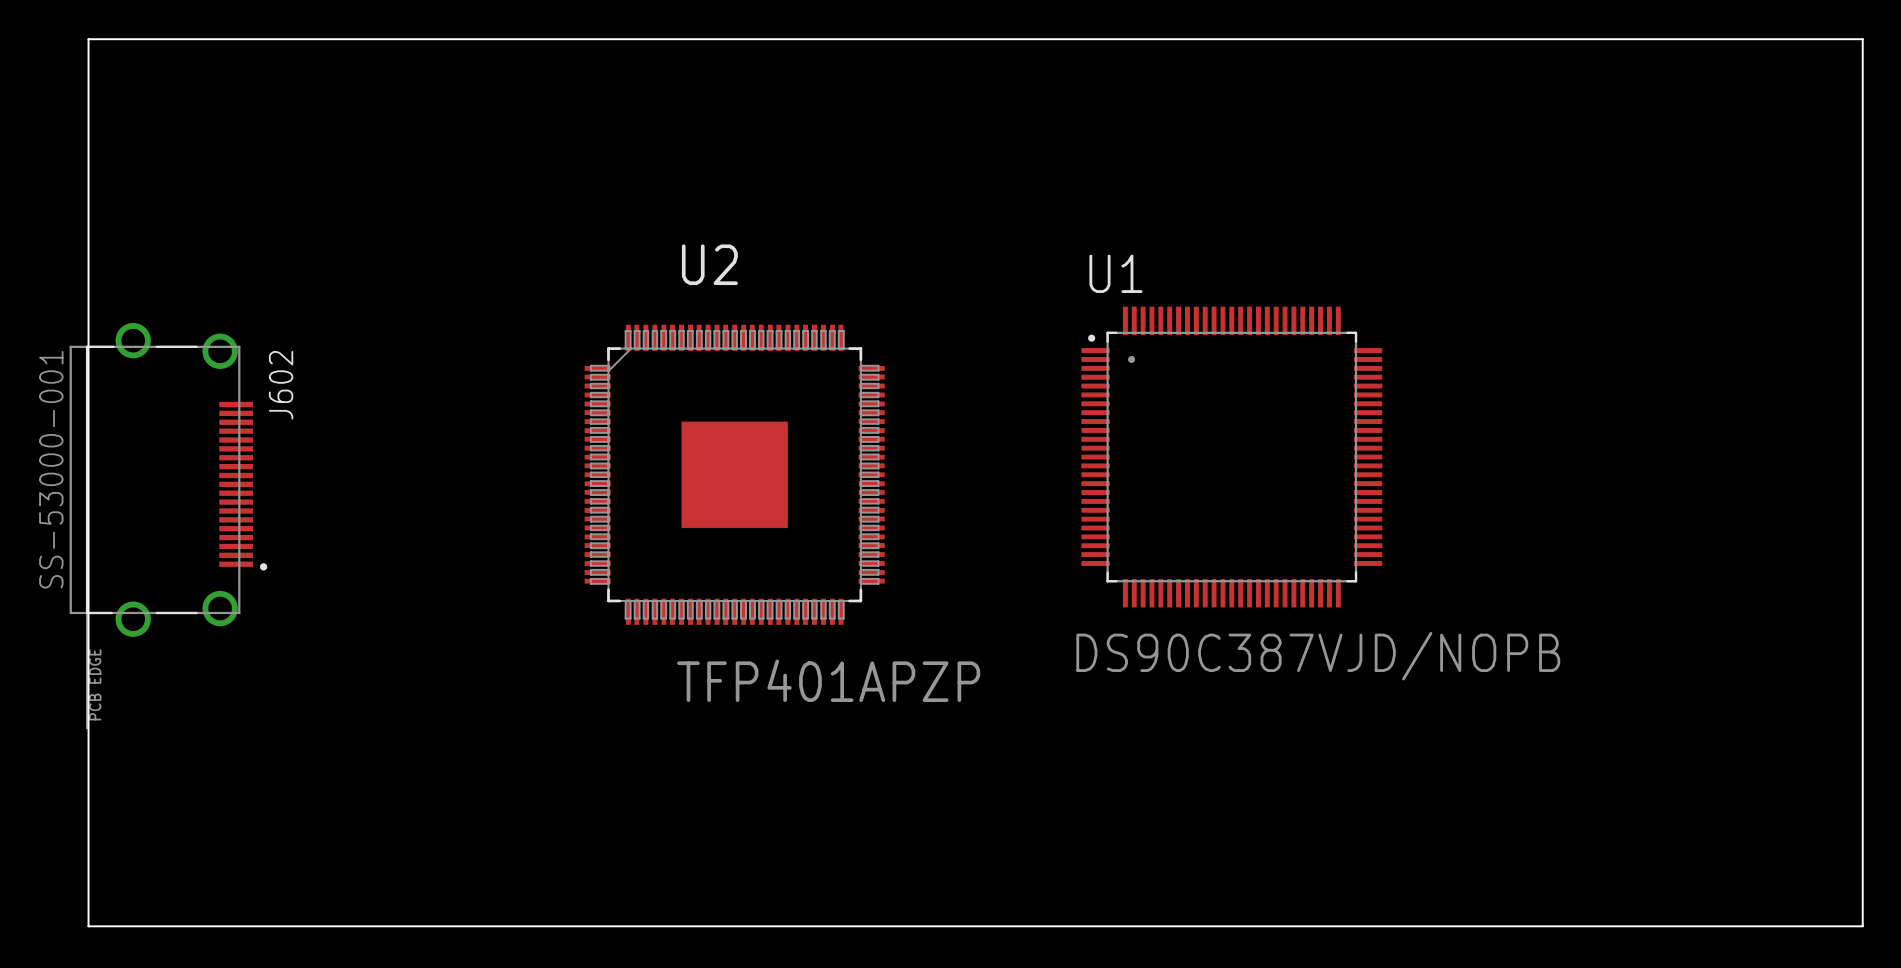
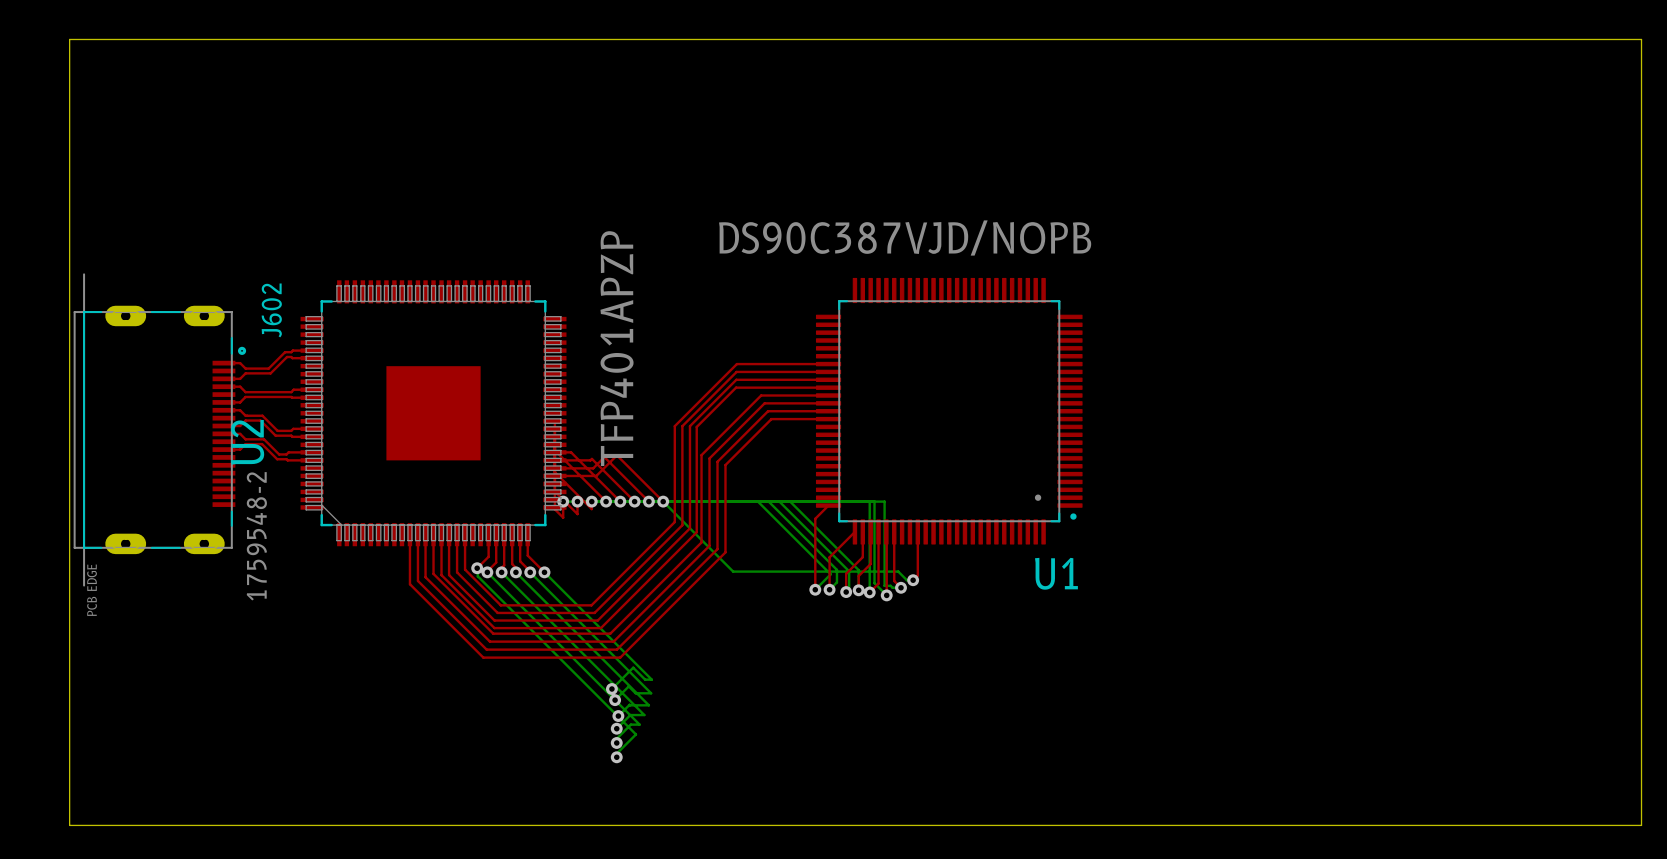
J602 footprint: [69, 322, 268, 730] -> [73, 273, 247, 587]
top track: none -> (312, 350) (285, 352) (268, 368) (245, 368) (240, 363) (223, 363)
top track: none -> (312, 358) (287, 357) (270, 373) (245, 373) (240, 378) (223, 378)
top track: none -> (828, 364) (736, 364) (674, 426) (674, 522) (591, 605) (500, 605) (465, 569) (465, 534)
top track: none -> (828, 371) (736, 371) (682, 426) (682, 525) (594, 612) (497, 612) (457, 572) (457, 534)
top track: none -> (828, 379) (736, 379) (689, 426) (689, 528) (597, 620) (494, 620) (449, 575) (449, 534)
top track: none -> (223, 386) (240, 386) (245, 392) (291, 392) (293, 389) (312, 389)
top track: none -> (828, 387) (736, 387) (696, 426) (696, 532) (600, 628) (494, 628) (441, 575) (441, 534)
top track: none -> (828, 395) (761, 395) (701, 455) (701, 542) (610, 633) (493, 633) (433, 573) (433, 534)
top track: none -> (312, 397) (245, 396) (240, 402) (223, 402)
top track: none -> (828, 403) (764, 403) (709, 458) (709, 545) (613, 641) (489, 641) (425, 577) (425, 534)
top track: none -> (223, 410) (240, 410) (245, 415) (262, 415) (277, 430) (312, 428)
U1 rotation: 0° (1231, 457) -> 180° (949, 411)
top track: none -> (828, 411) (768, 411) (717, 461) (717, 549) (616, 649) (486, 649) (417, 580) (417, 534)
top track: none -> (828, 419) (771, 419) (725, 465) (725, 552) (620, 657) (483, 657) (409, 584) (409, 534)
J602 value: SS-53000-001 (51, 469) -> 1759548-2 (256, 536)
top track: none -> (554, 421) (554, 509) (563, 517) (563, 501)
U2 rotation: 0° (734, 474) -> 90° counterclockwise (433, 413)
U2 position: (734, 474) -> (433, 413)
top track: none -> (223, 426) (240, 426) (245, 420) (260, 420) (275, 435) (312, 436)
top track: none -> (223, 433) (240, 433) (245, 439) (264, 439) (279, 454) (312, 452)
top track: none -> (223, 449) (240, 449) (245, 444) (262, 444) (277, 459) (312, 460)
top track: none -> (554, 450) (606, 501)
top track: none -> (554, 452) (571, 452) (620, 501)
top track: none -> (554, 460) (591, 458) (634, 501)
top track: none -> (554, 468) (593, 468) (604, 457) (648, 501)
top track: none -> (554, 472) (591, 509) (591, 501)
top track: none -> (554, 475) (596, 475) (616, 455) (663, 501)
top track: none -> (554, 491) (577, 514) (577, 501)
bottom track: none -> (563, 501) (884, 501) (884, 585) (901, 587)
via: none -> (563, 501)
via: none -> (577, 501)
via: none -> (591, 501)
via: none -> (606, 501)
via: none -> (620, 501)
via: none -> (634, 501)
via: none -> (648, 501)
bottom track: none -> (663, 501) (733, 571) (898, 571) (906, 580) (913, 580)
via: none -> (663, 501)
bottom track: none -> (757, 501) (830, 574) (815, 589)
bottom track: none -> (768, 501) (836, 569) (836, 582) (829, 589)
bottom track: none -> (779, 501) (849, 571) (849, 589) (846, 592)
bottom track: none -> (790, 501) (858, 570) (858, 590)
bottom track: none -> (869, 501) (869, 592)
bottom track: none -> (874, 501) (874, 583) (886, 595)
top track: none -> (828, 505) (815, 518) (815, 589)
top track: none -> (854, 531) (829, 557) (829, 589)
top track: none -> (862, 531) (862, 557) (846, 573) (846, 592)
top track: none -> (870, 531) (870, 564) (858, 576) (858, 590)
top track: none -> (878, 531) (878, 583) (869, 592)
top track: none -> (886, 531) (886, 595)
top track: none -> (894, 531) (894, 581) (901, 587)
top track: none -> (917, 531) (917, 575) (913, 580)
top track: none -> (488, 534) (488, 556) (477, 568)
top track: none -> (496, 534) (496, 562) (487, 572)
top track: none -> (504, 534) (504, 565) (501, 567) (501, 572)
top track: none -> (512, 534) (512, 564) (515, 567) (515, 572)
top track: none -> (520, 534) (520, 561) (530, 572)
top track: none -> (527, 534) (527, 555) (544, 572)
bottom track: none -> (477, 568) (477, 576) (635, 734) (616, 753) (616, 757)
via: none -> (477, 568)
bottom track: none -> (487, 572) (639, 724) (630, 724) (616, 738) (616, 742)
via: none -> (487, 572)
bottom track: none -> (501, 572) (644, 715) (630, 715) (616, 728)
via: none -> (501, 572)
bottom track: none -> (515, 572) (648, 705) (629, 704) (618, 716)
via: none -> (515, 572)
bottom track: none -> (530, 572) (651, 693) (635, 693) (628, 686) (615, 700)
via: none -> (530, 572)
bottom track: none -> (544, 572) (651, 679) (645, 679) (633, 667) (611, 689)
via: none -> (544, 572)
via: none -> (913, 580)
via: none -> (901, 587)
via: none -> (815, 589)
via: none -> (829, 589)
via: none -> (858, 590)
via: none -> (846, 592)
via: none -> (869, 592)
via: none -> (886, 595)
via: none -> (611, 689)
via: none -> (615, 700)
via: none -> (618, 716)
via: none -> (616, 728)
via: none -> (616, 742)
via: none -> (616, 757)

